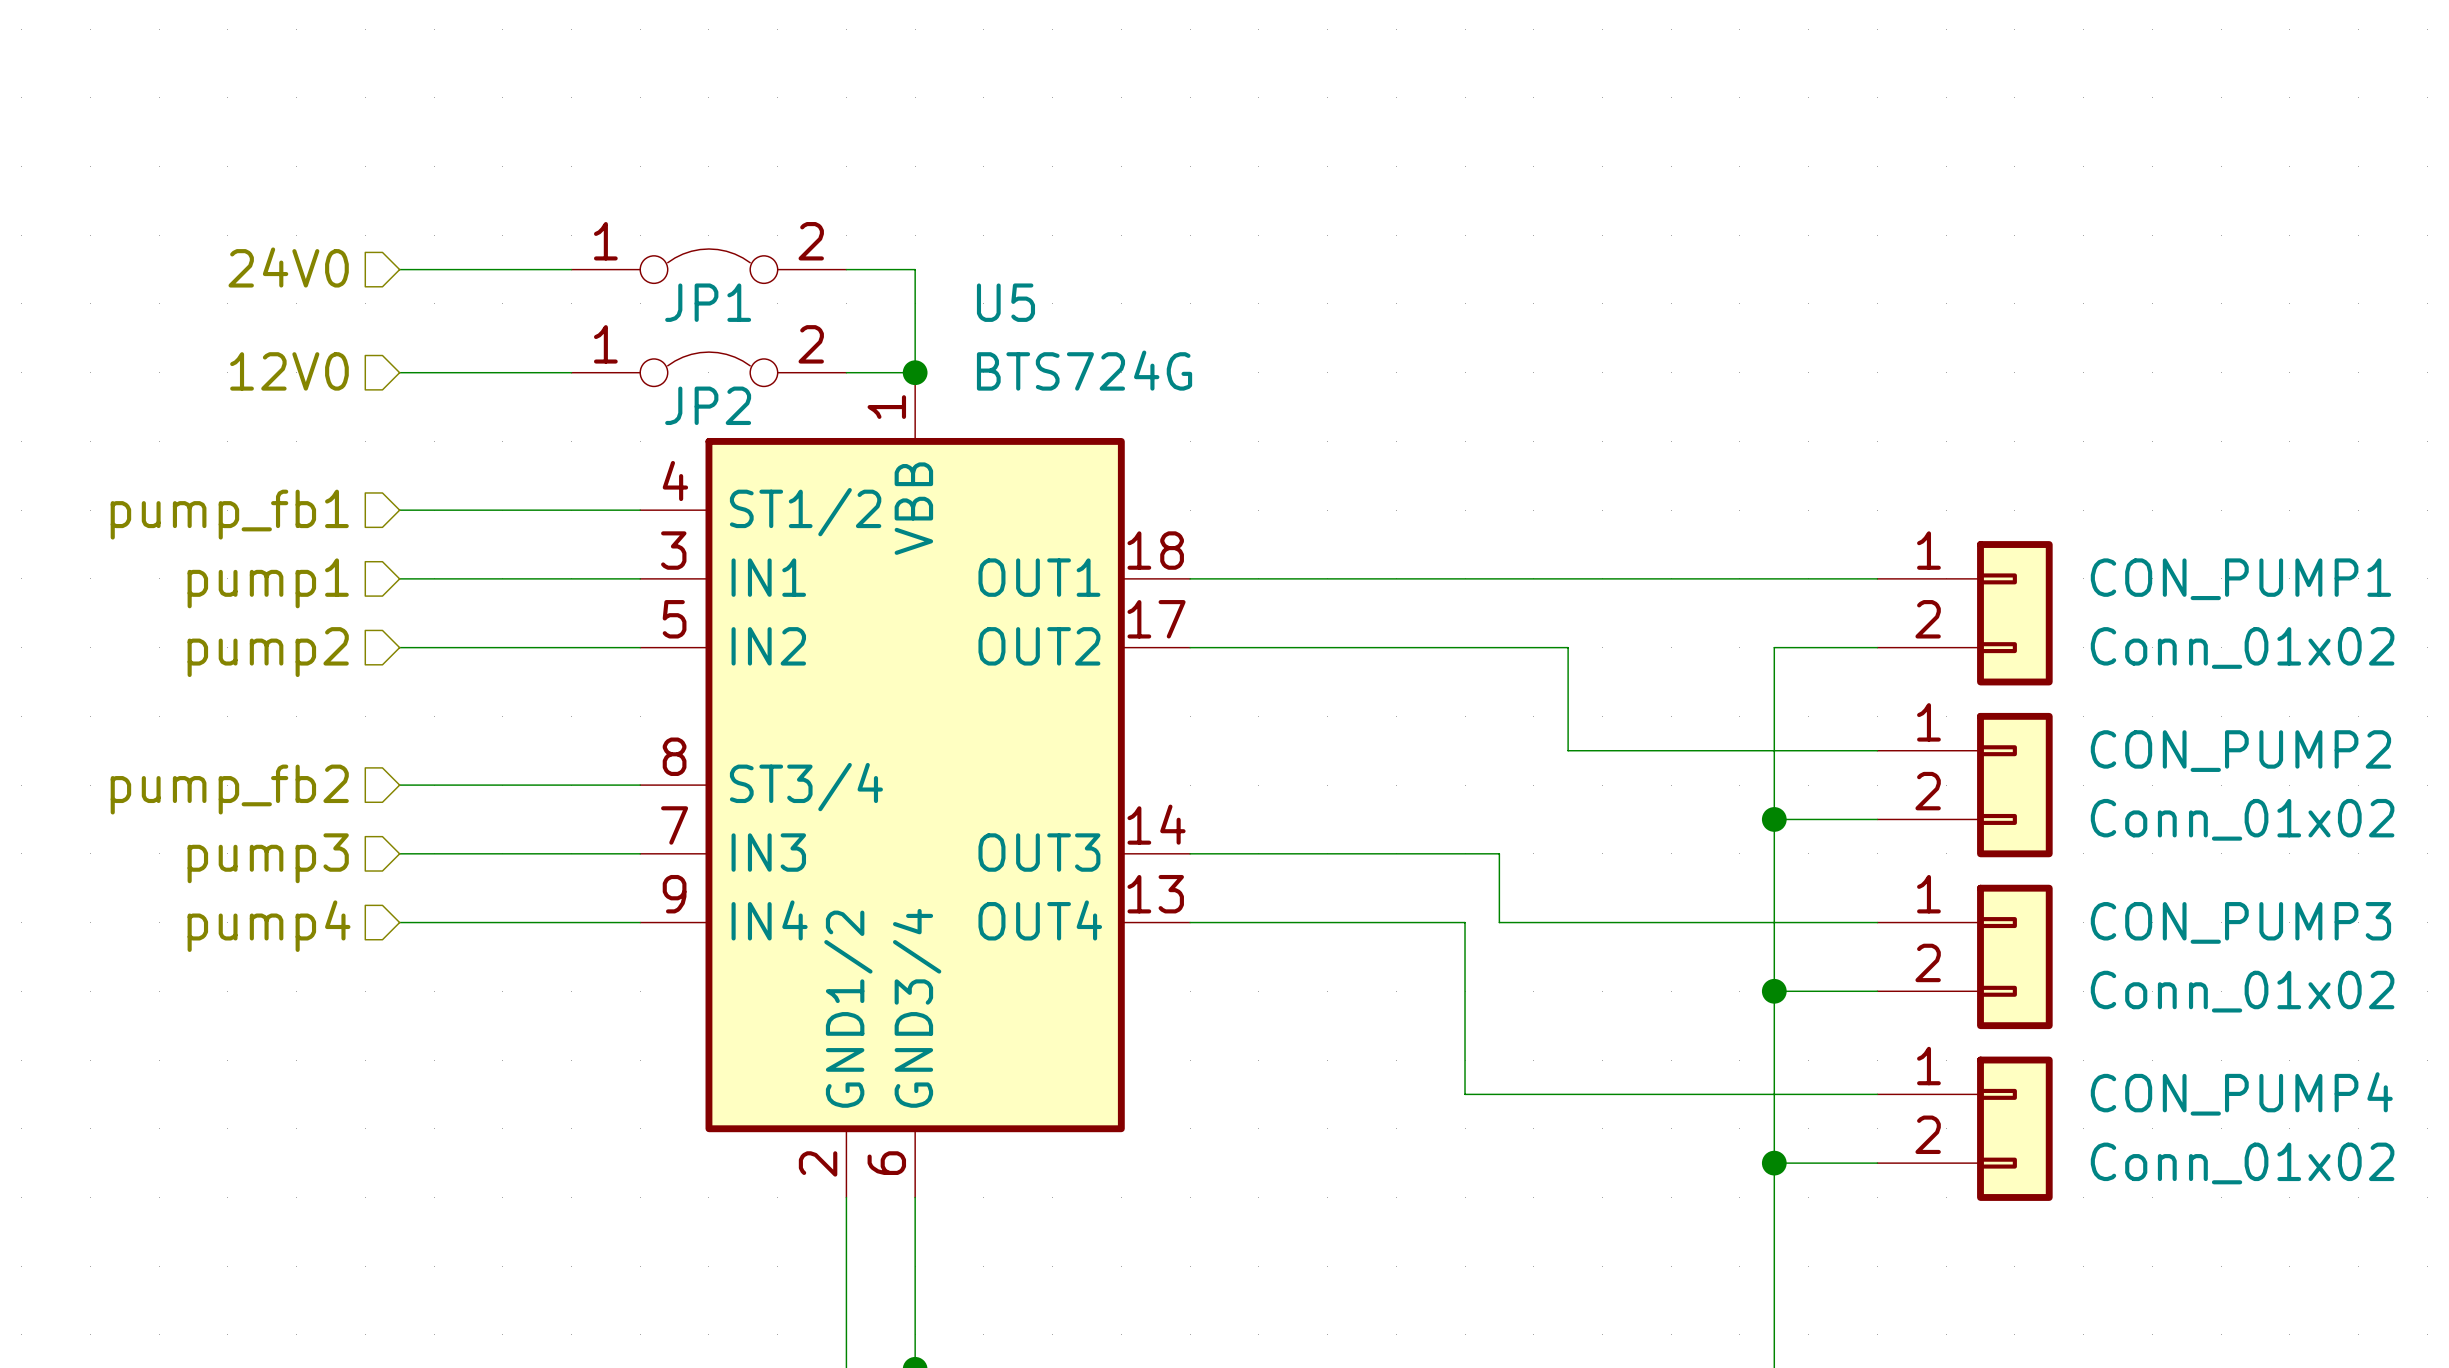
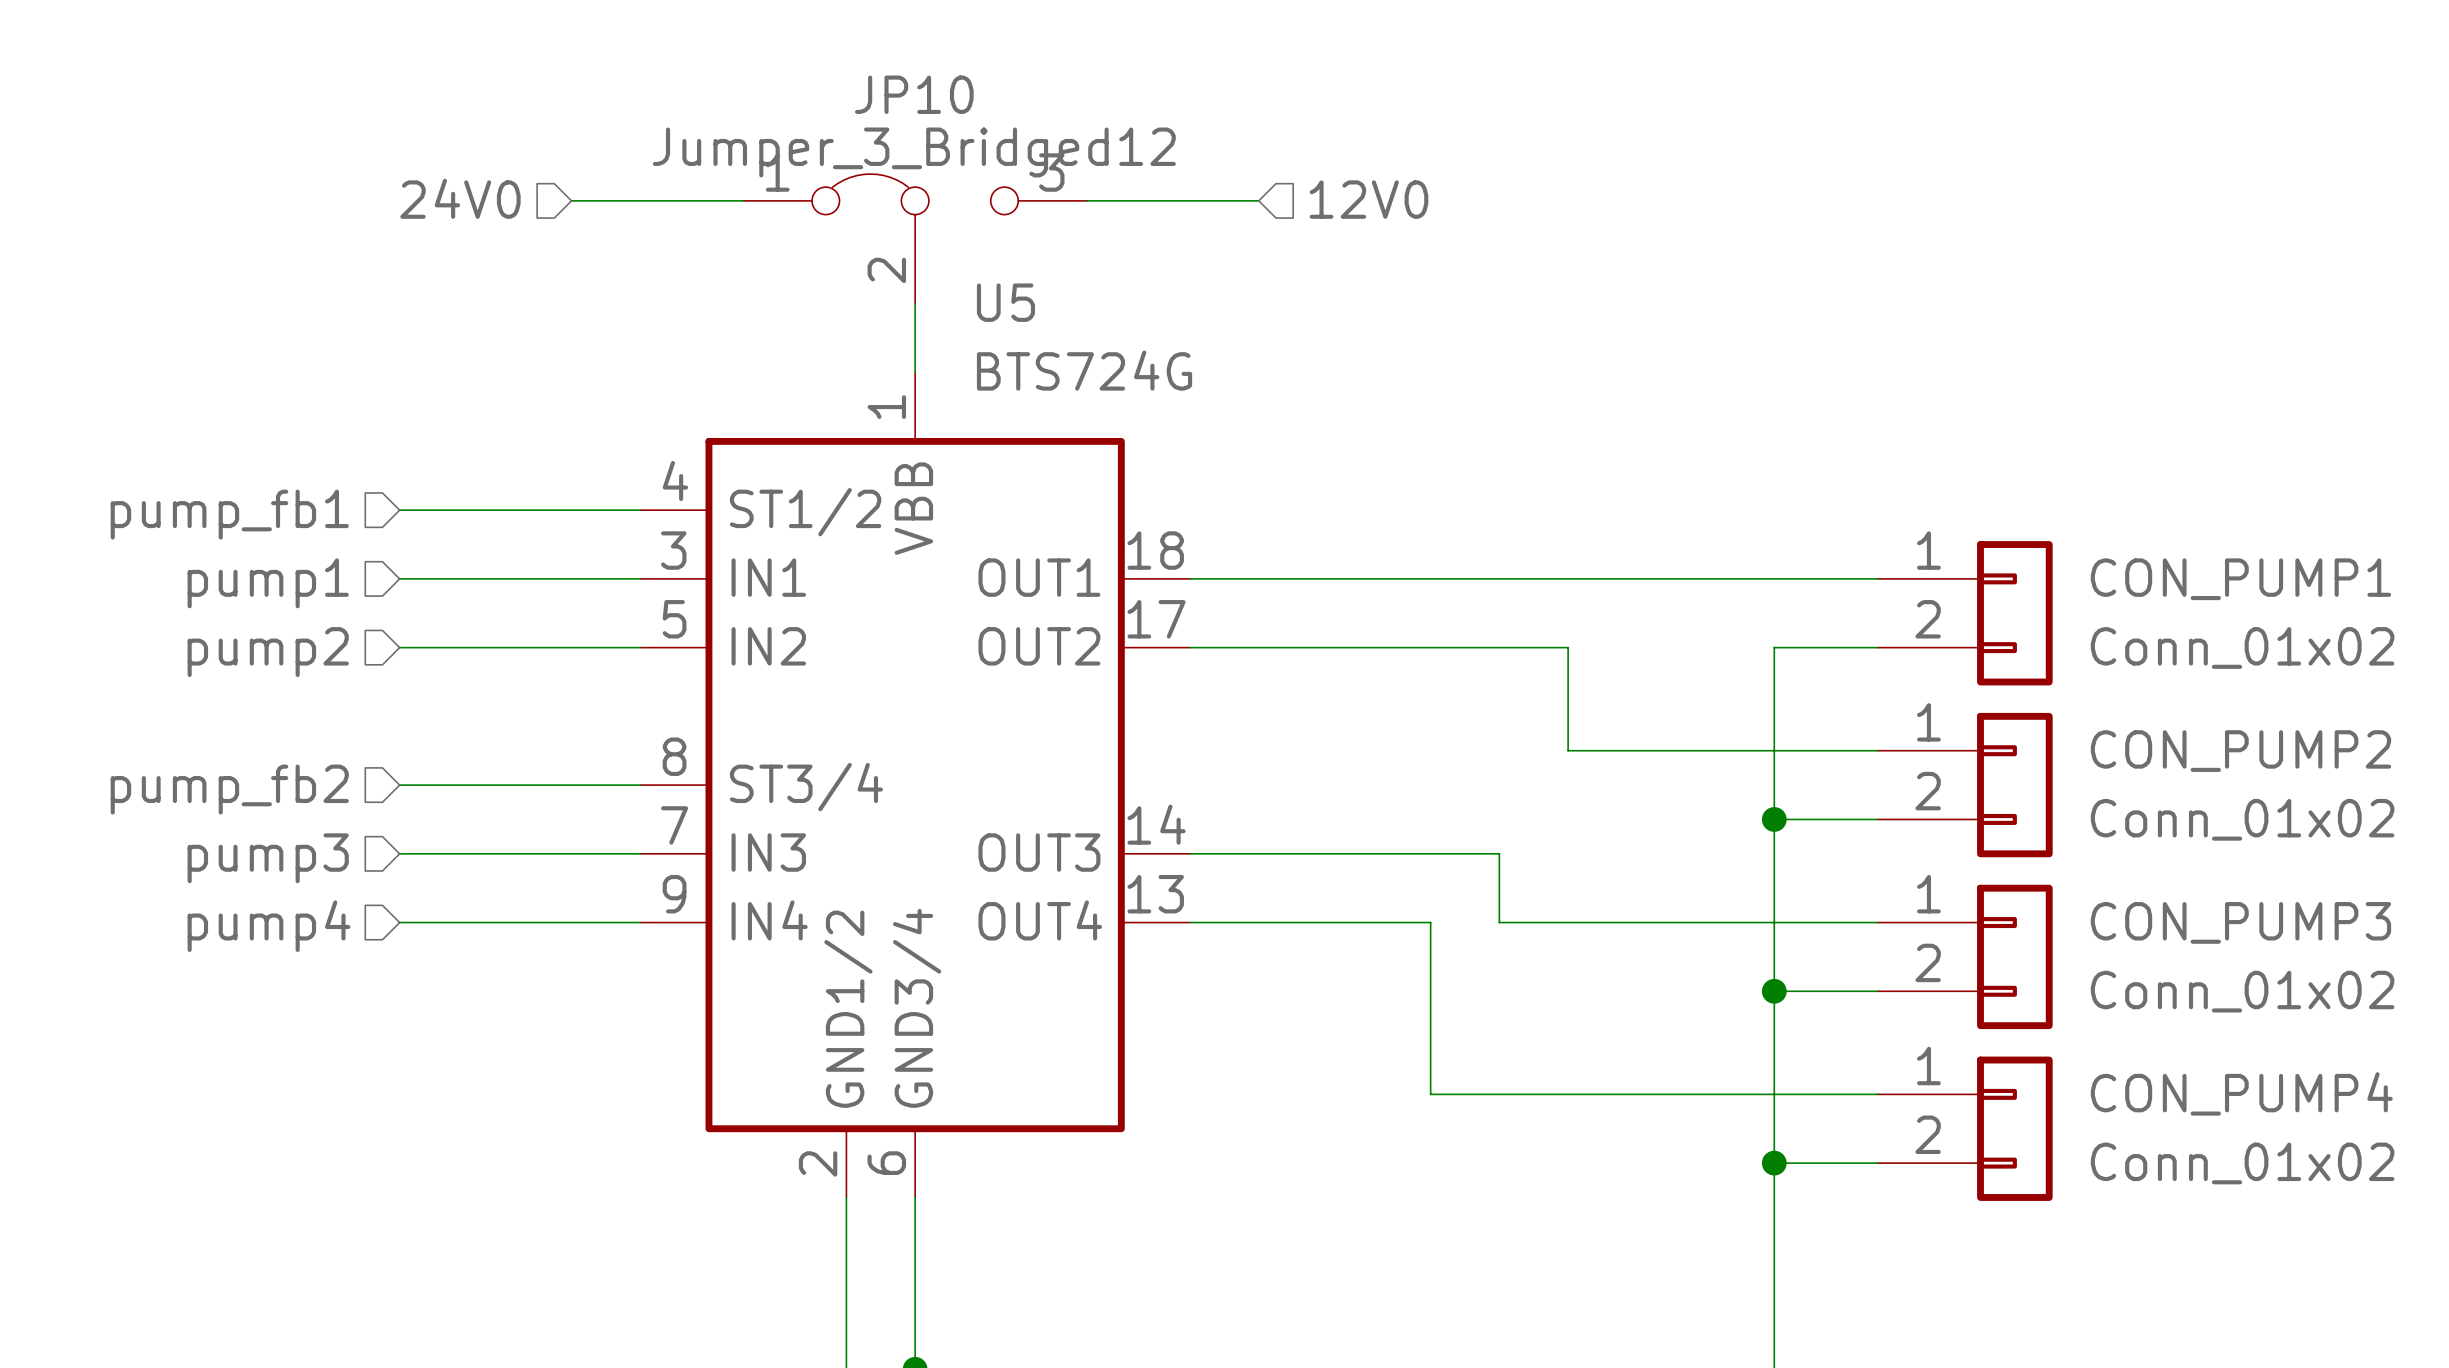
hierarchical label: none -> 12V0 (1368, 199)
wire: none -> (1086, 200) (1258, 200)
JP10: none -> Jumper_3_Bridged12 (915, 239)
JP1: (708, 266) -> none
hierarchical label position: 24V0 (288, 267) -> 24V0 (460, 198)
wire: (399, 269) (571, 269) -> (571, 200) (743, 200)
wire: (846, 269) (915, 269) (915, 303) -> none
JP2: (708, 369) -> none
hierarchical label: 12V0 (289, 371) -> none
wire: (399, 372) (571, 372) -> none
wire: (846, 372) (915, 372) -> none
junction: (915, 372) -> none
wire: (1430, 922) (1465, 922) (1465, 1094) -> (1430, 922) (1430, 1094) (1465, 1094)

